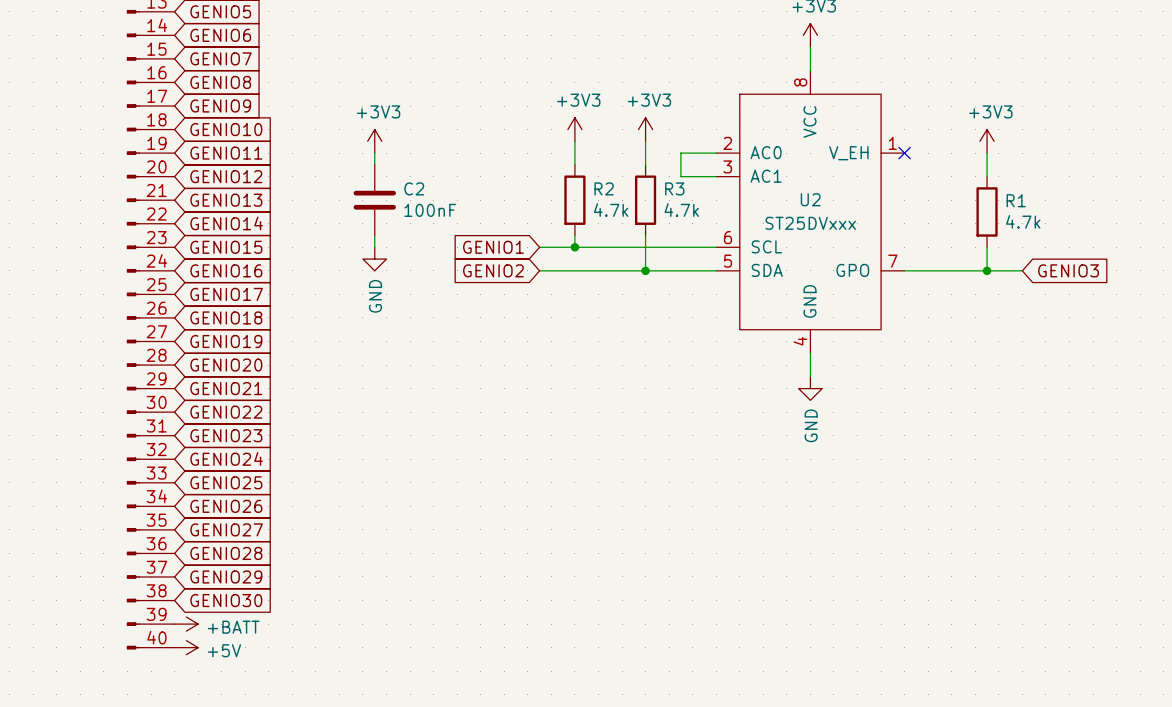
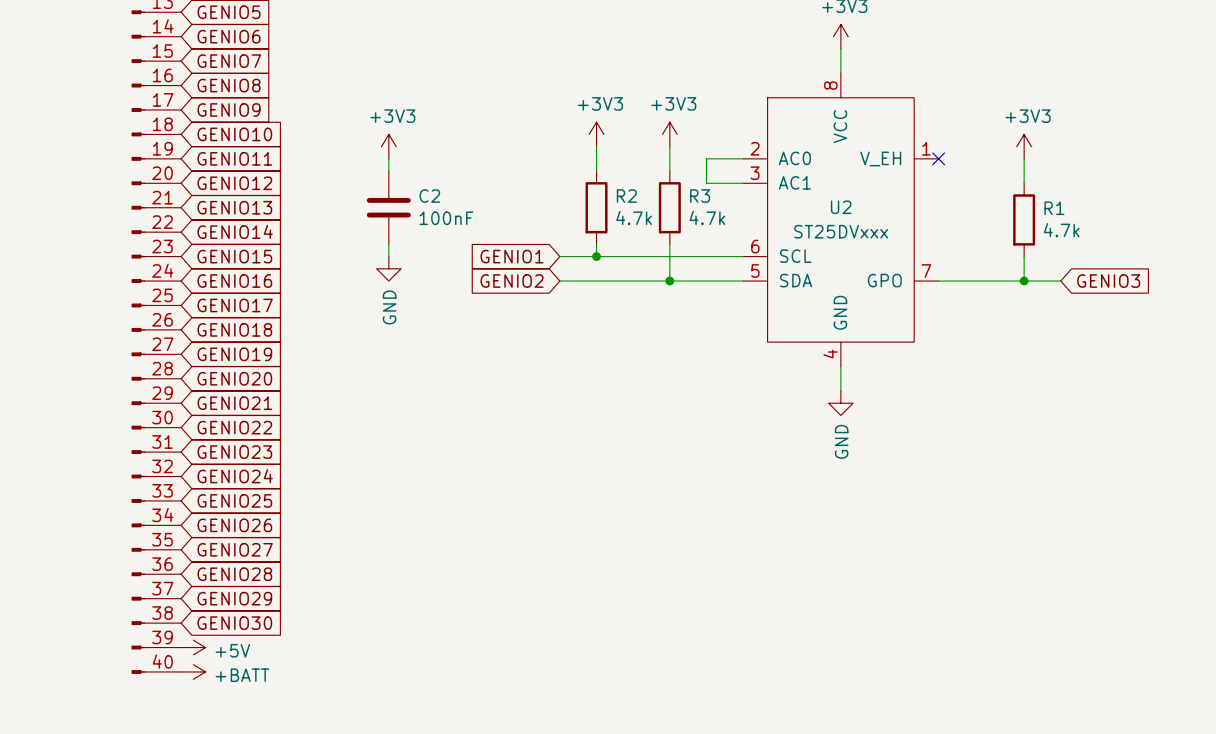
power symbol: +BATT (186, 624) -> +5V (193, 647)
power symbol: +5V (186, 647) -> +BATT (193, 671)

